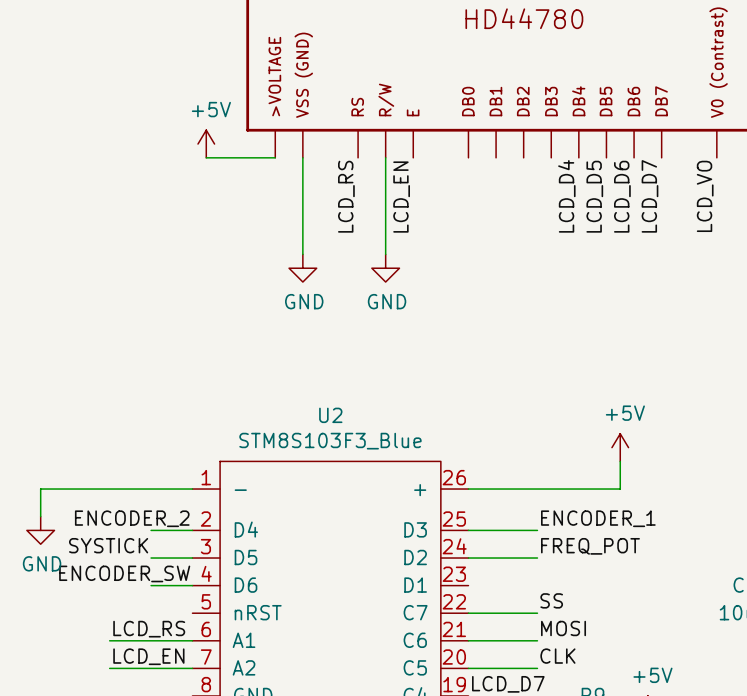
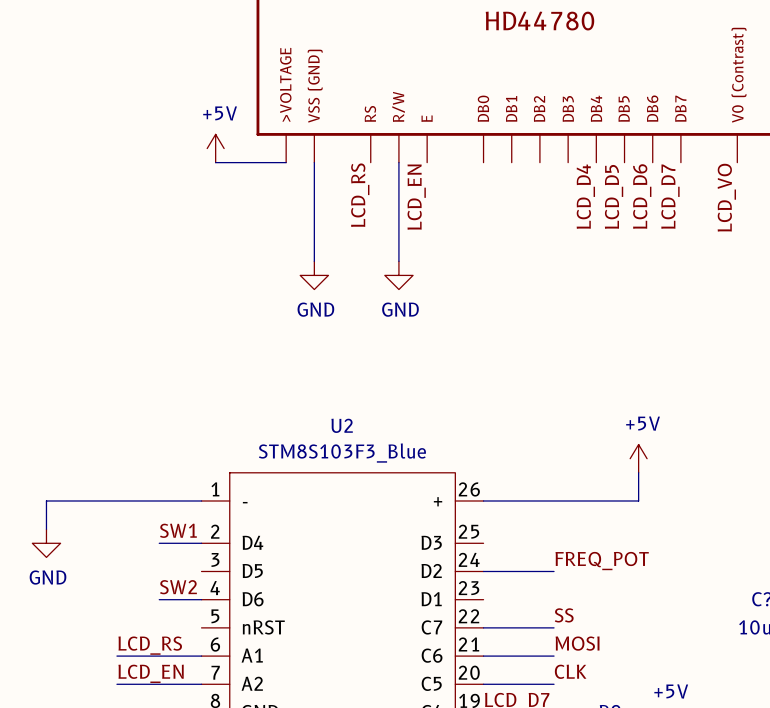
label: ENCODER_2 (132, 518) -> none
label: none -> SW1 (178, 530)
label: ENCODER_1 (598, 518) -> none
wire: (468, 530) (537, 530) -> none
label: SYSTICK (108, 545) -> none
wire: (151, 558) (192, 558) -> none
label: ENCODER_SW (124, 573) -> none
label: none -> SW2 (178, 587)

